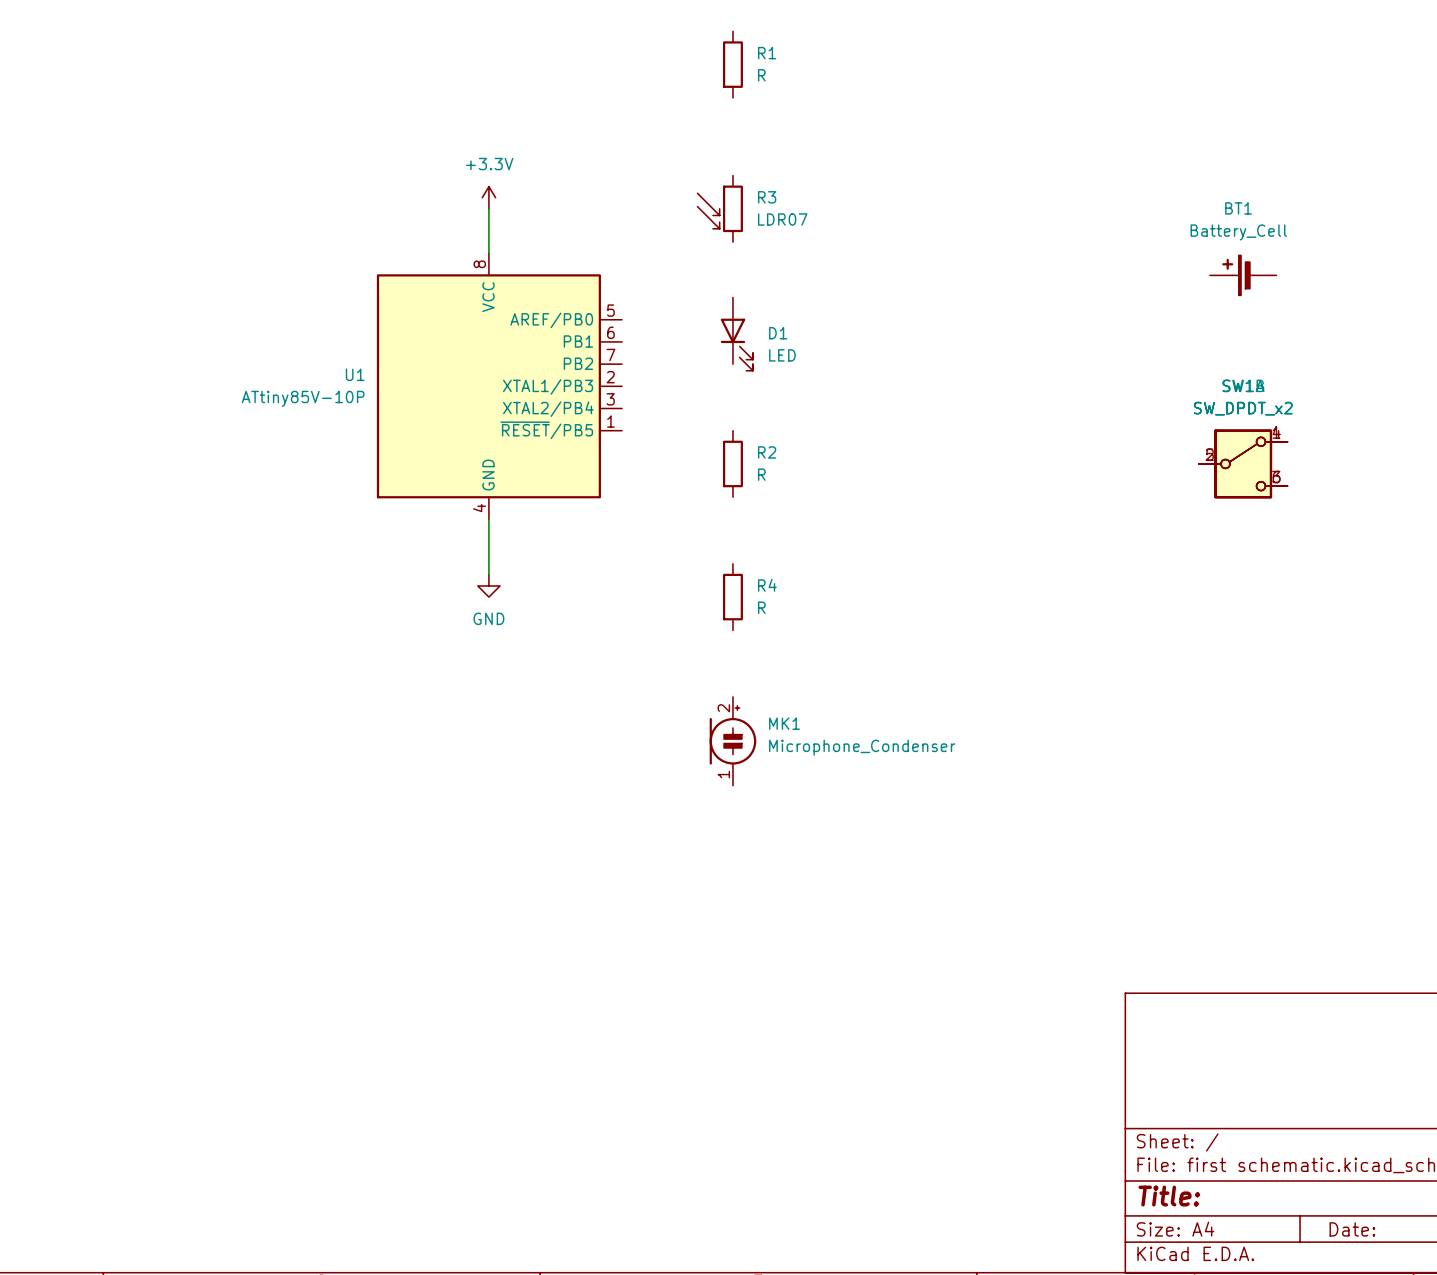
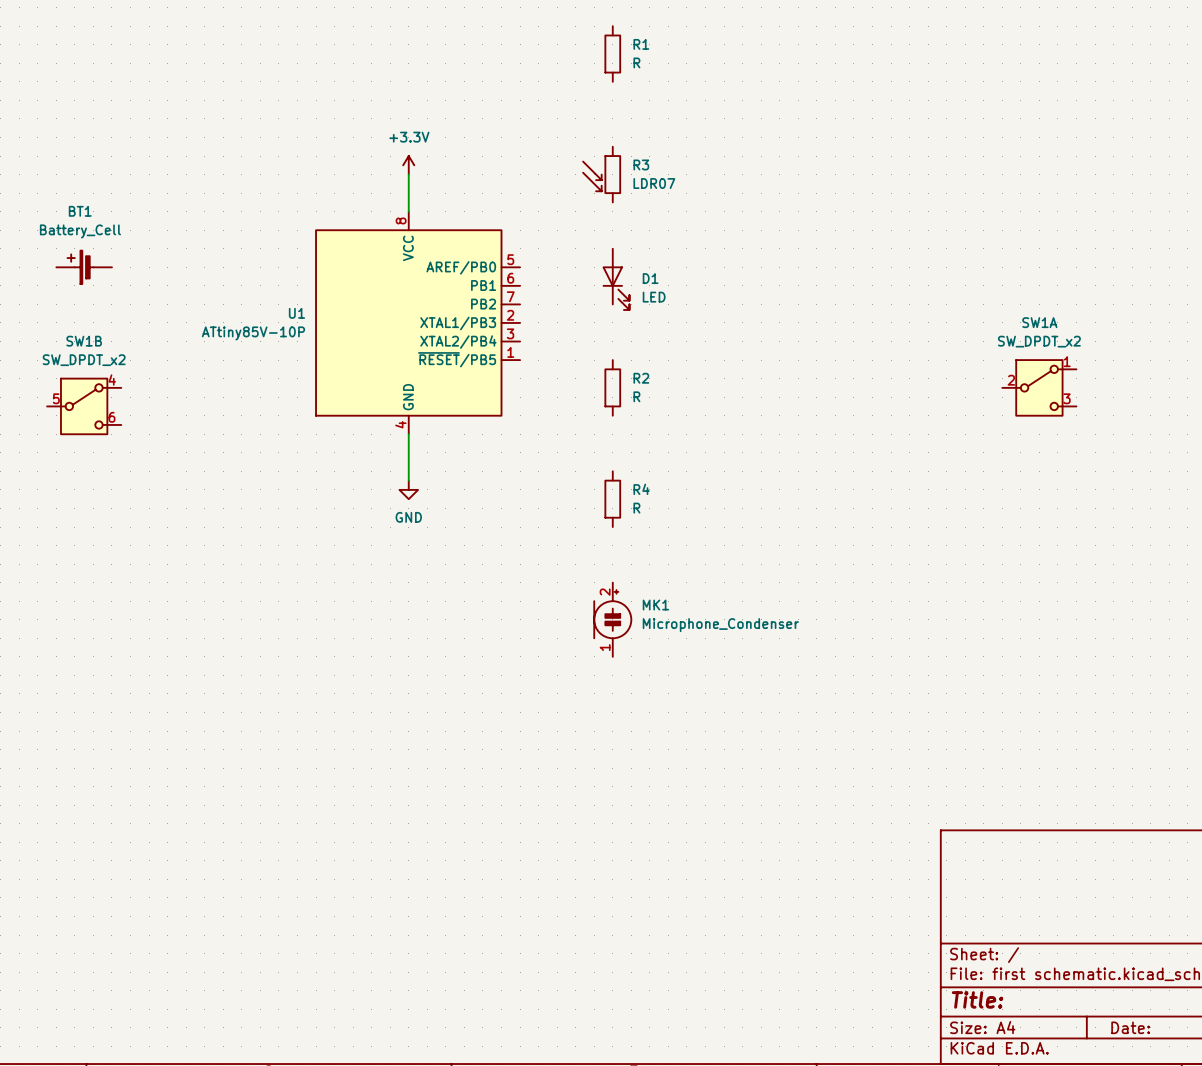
BT1 position: (1243, 275) -> (84, 267)
SW1B position: (1243, 463) -> (84, 406)

